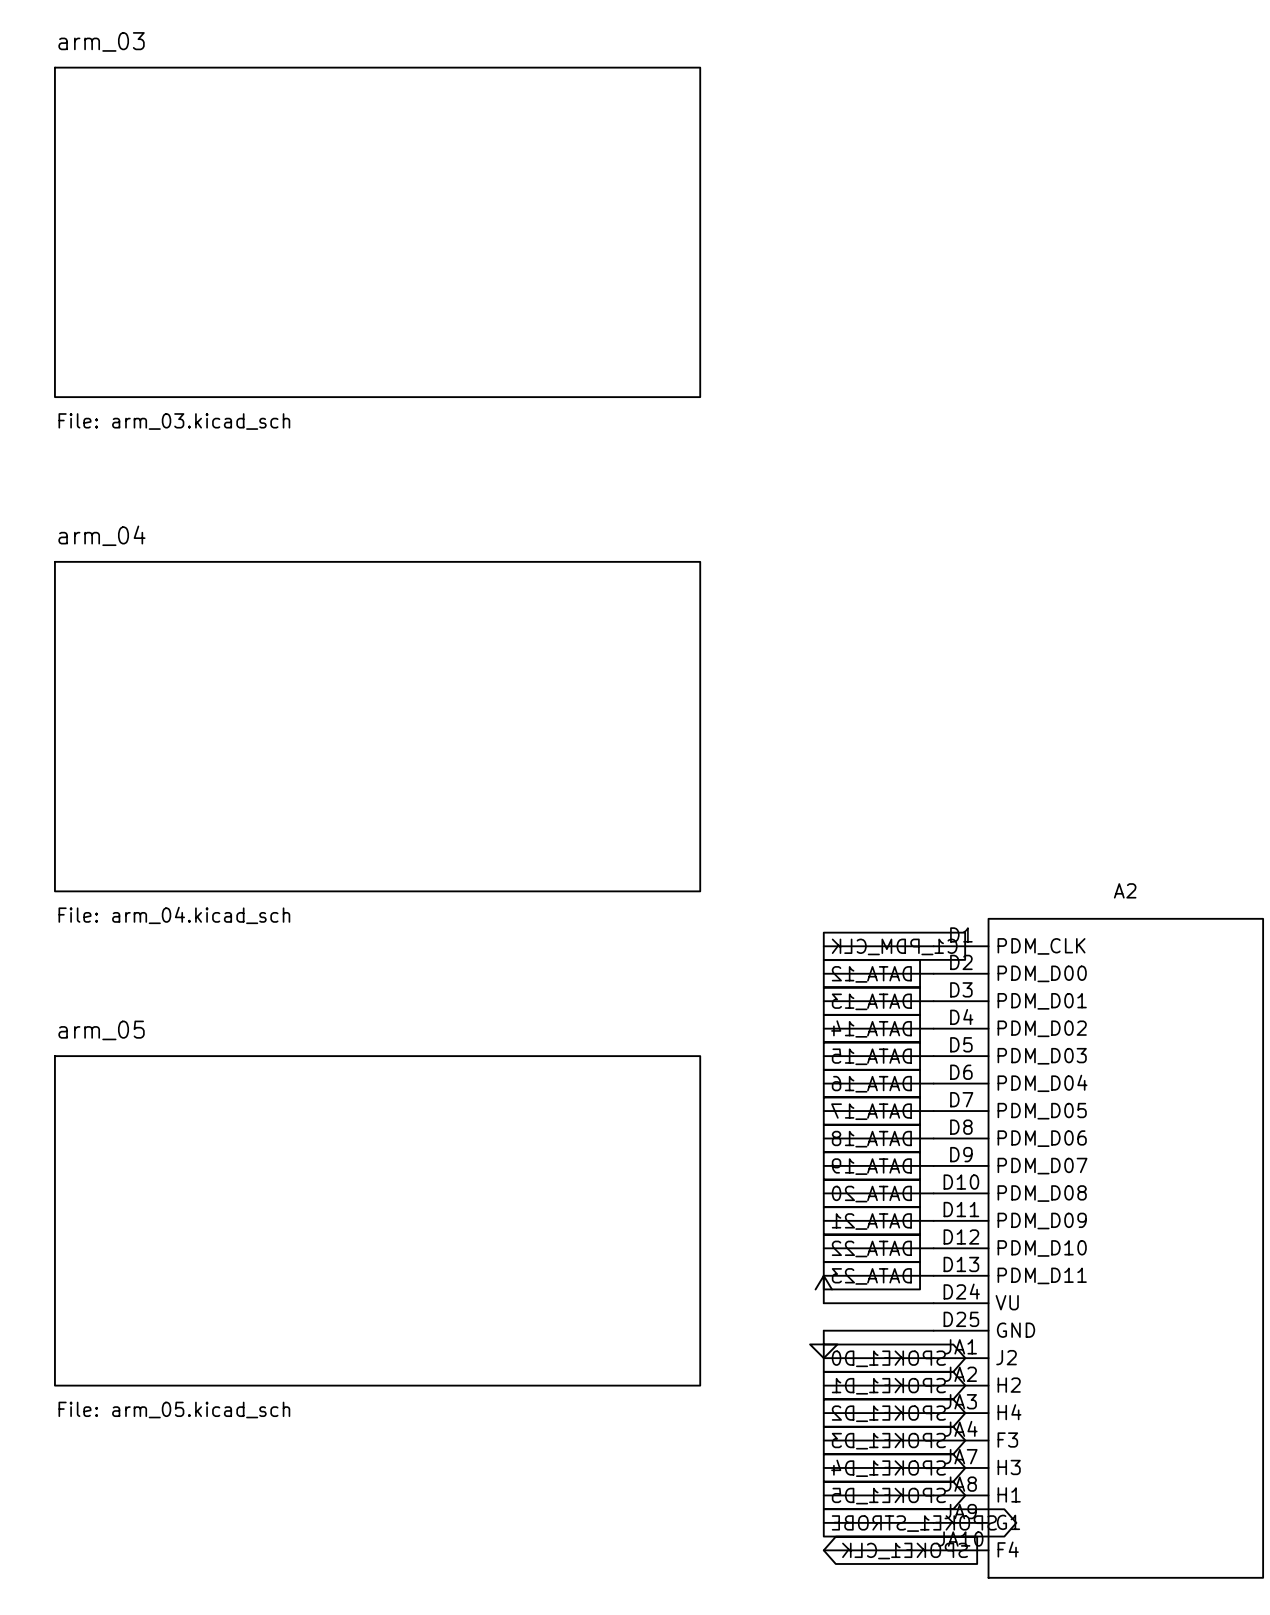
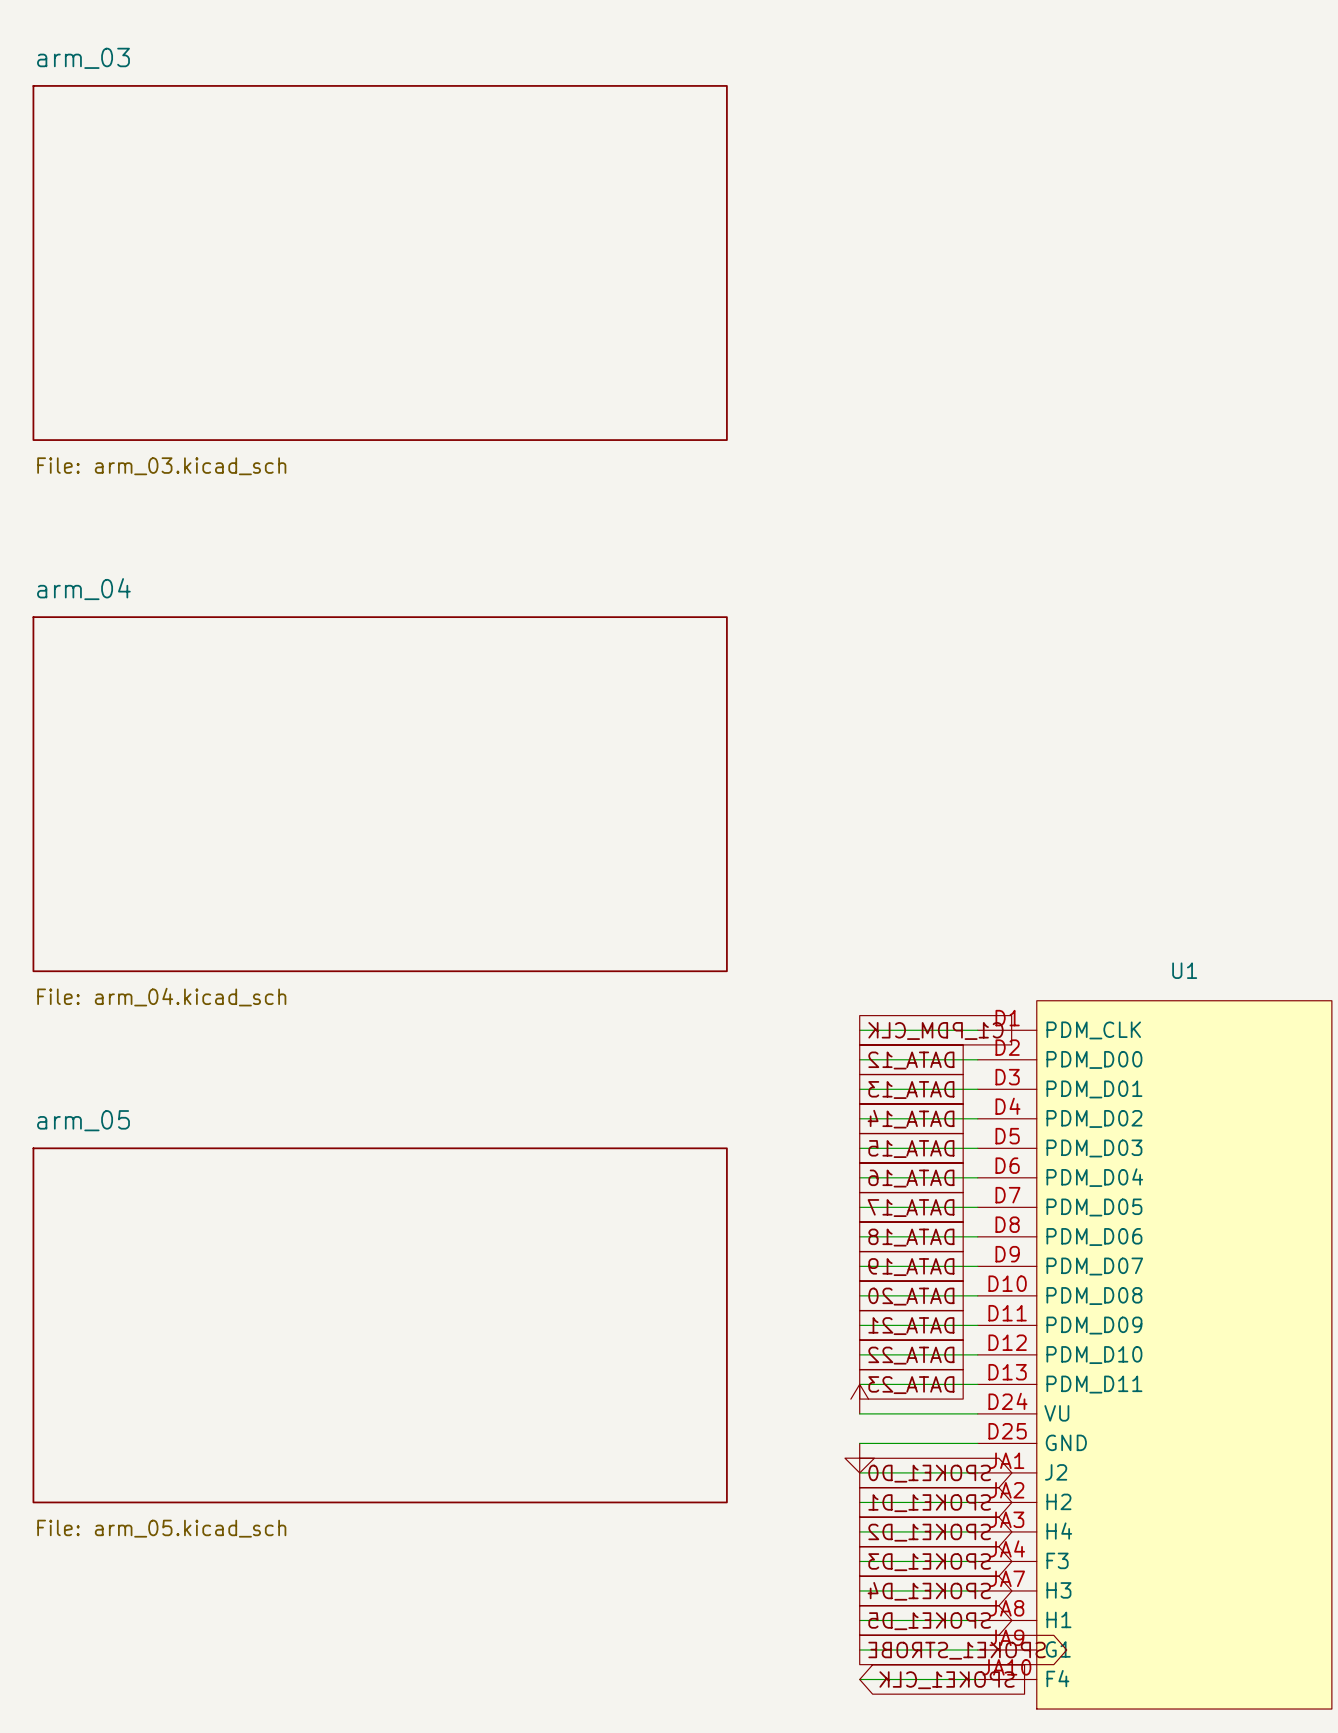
A2 name: A2 (1125, 890) -> U1 (1184, 970)

